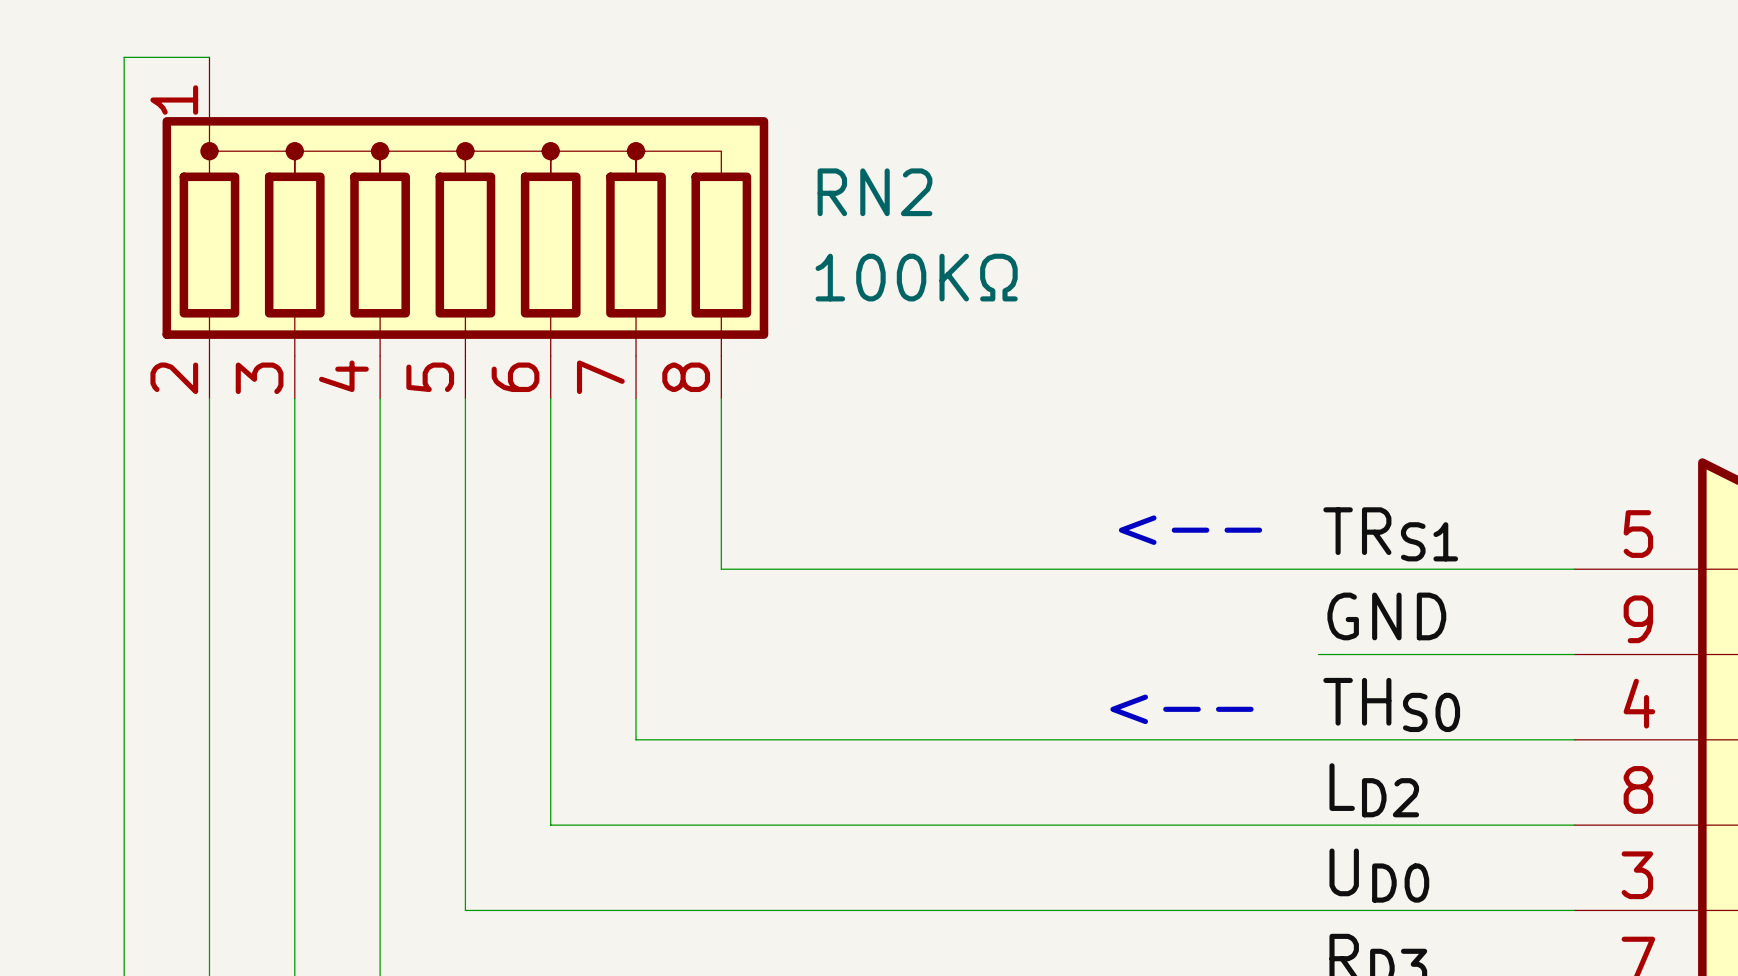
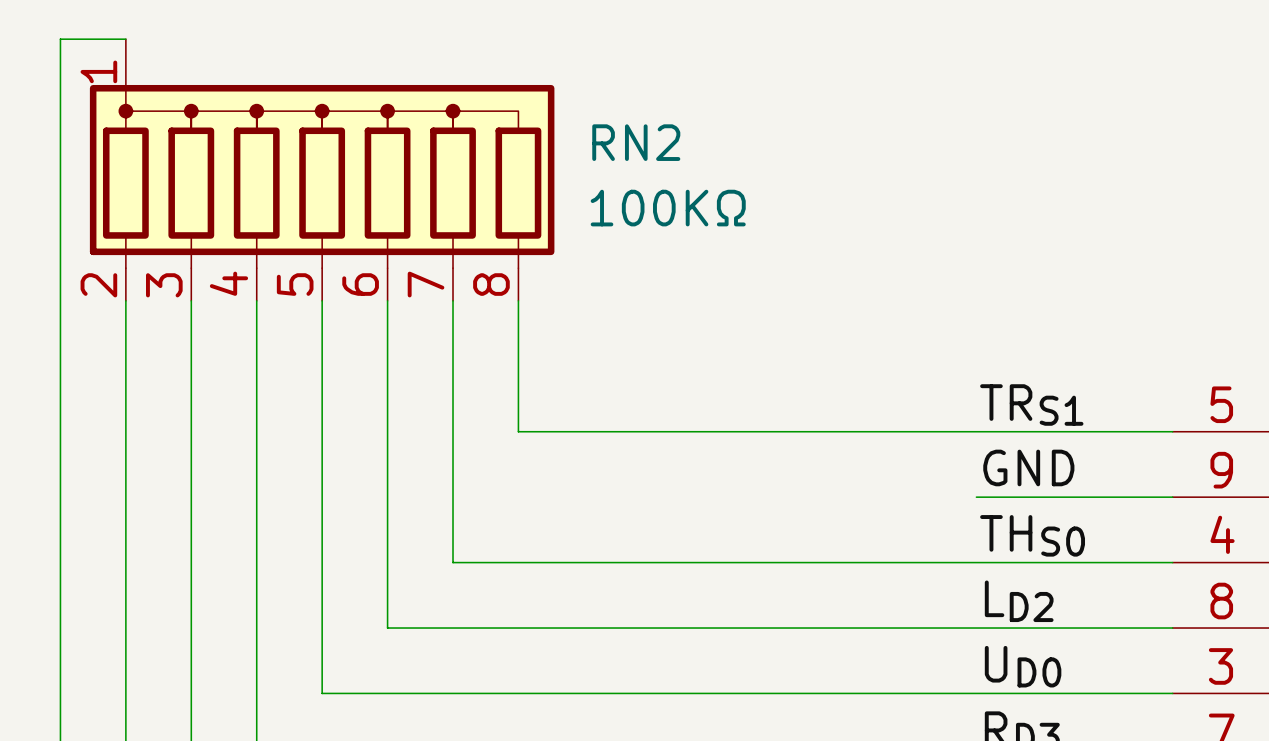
text: <-- (1190, 530) -> none
text: <-- (1181, 709) -> none

